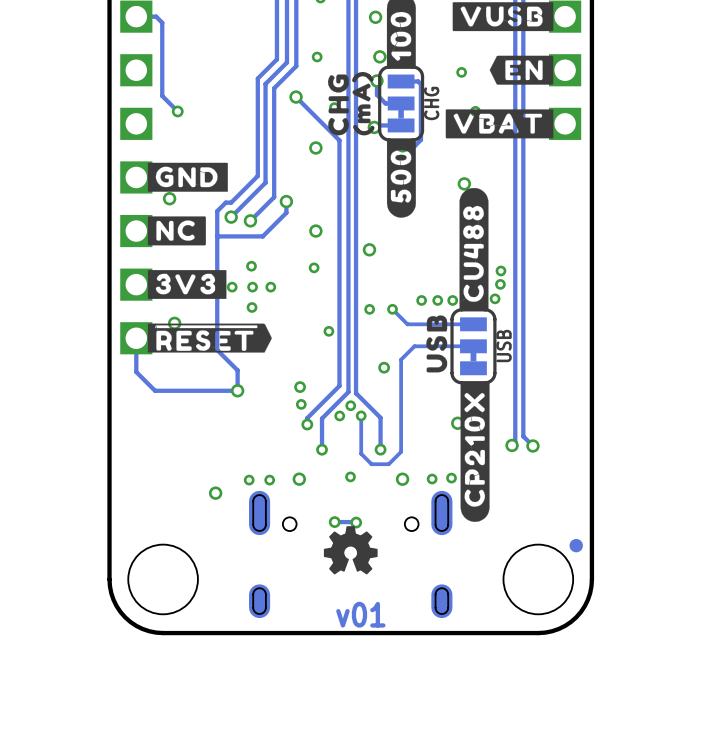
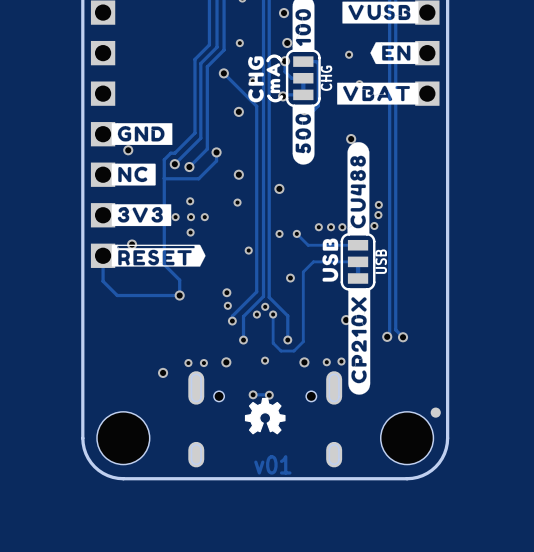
track: (136, 16) (156, 16) (162, 22) (162, 95) (177, 111) -> none
via: (177, 111) -> none

